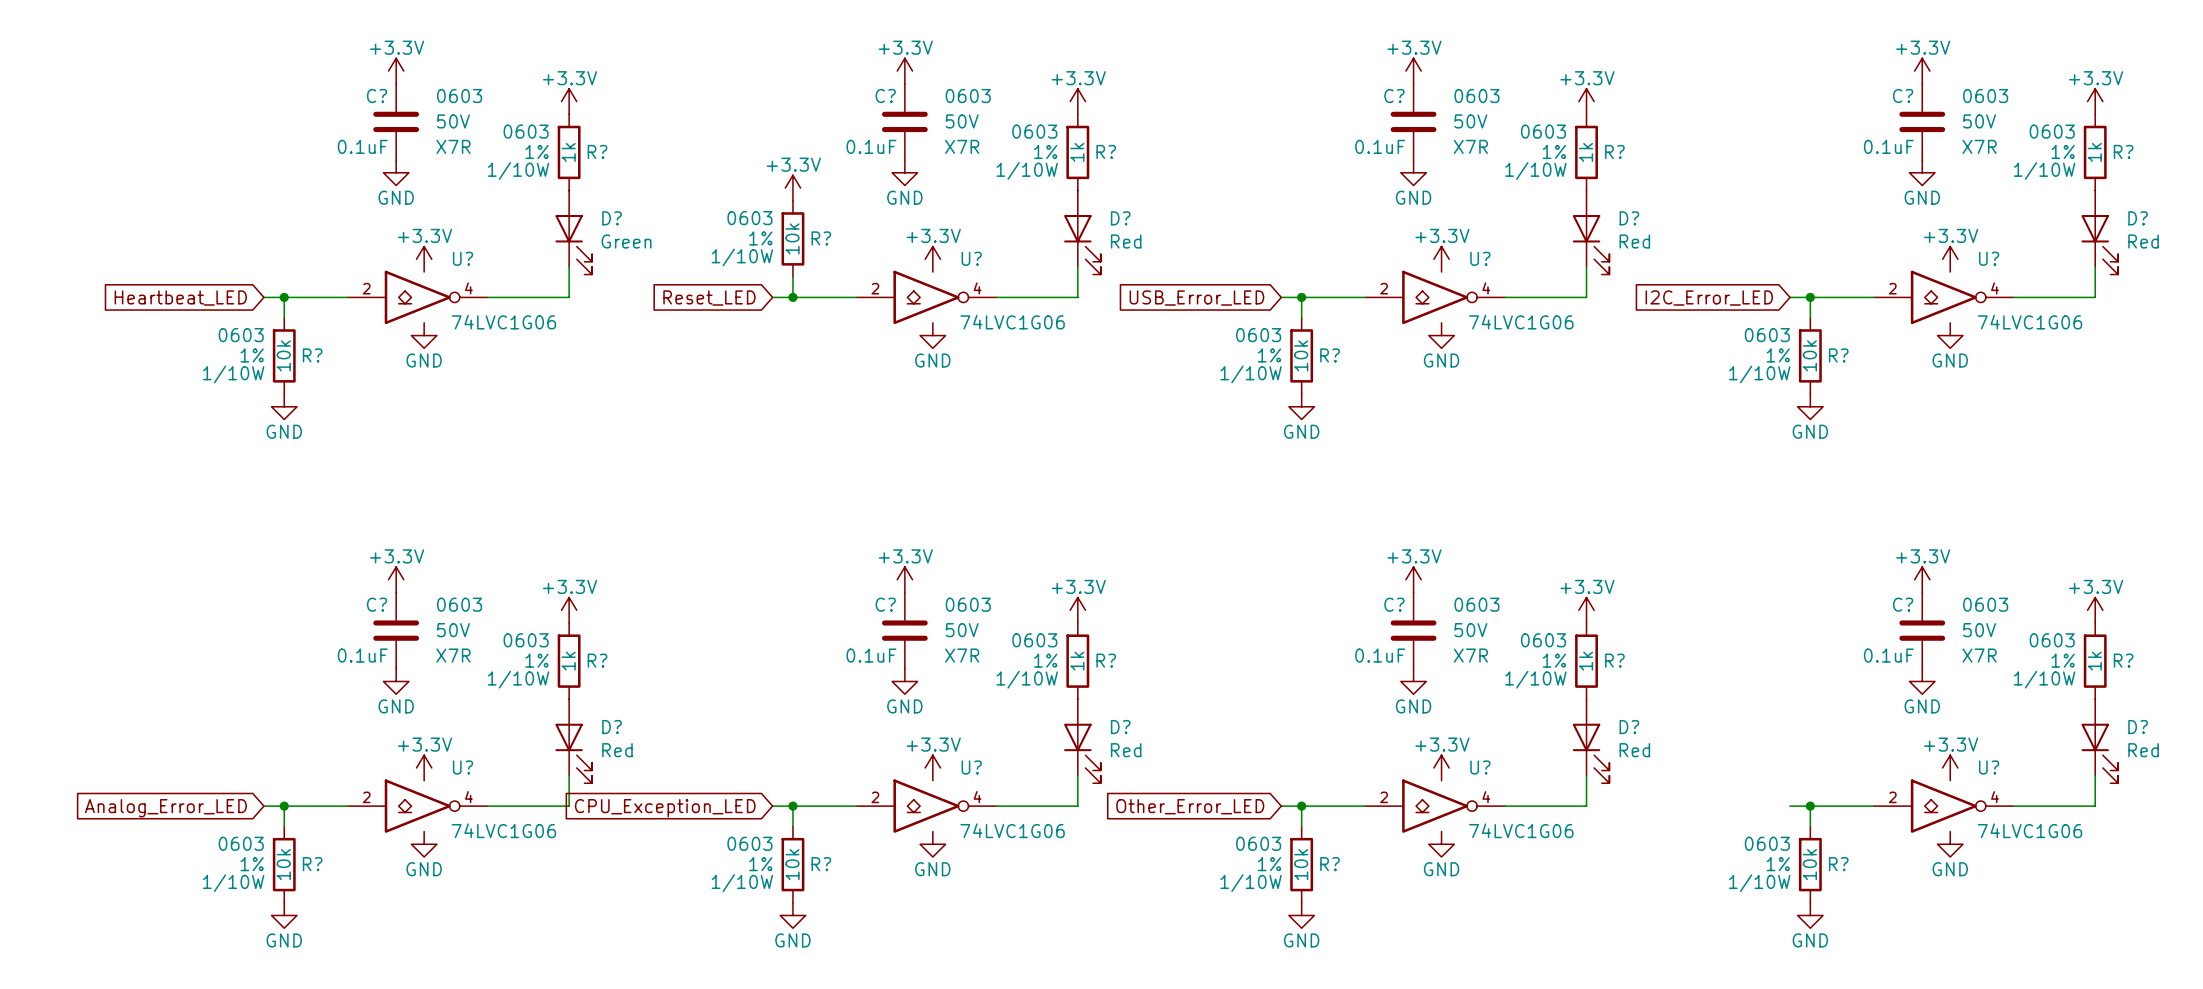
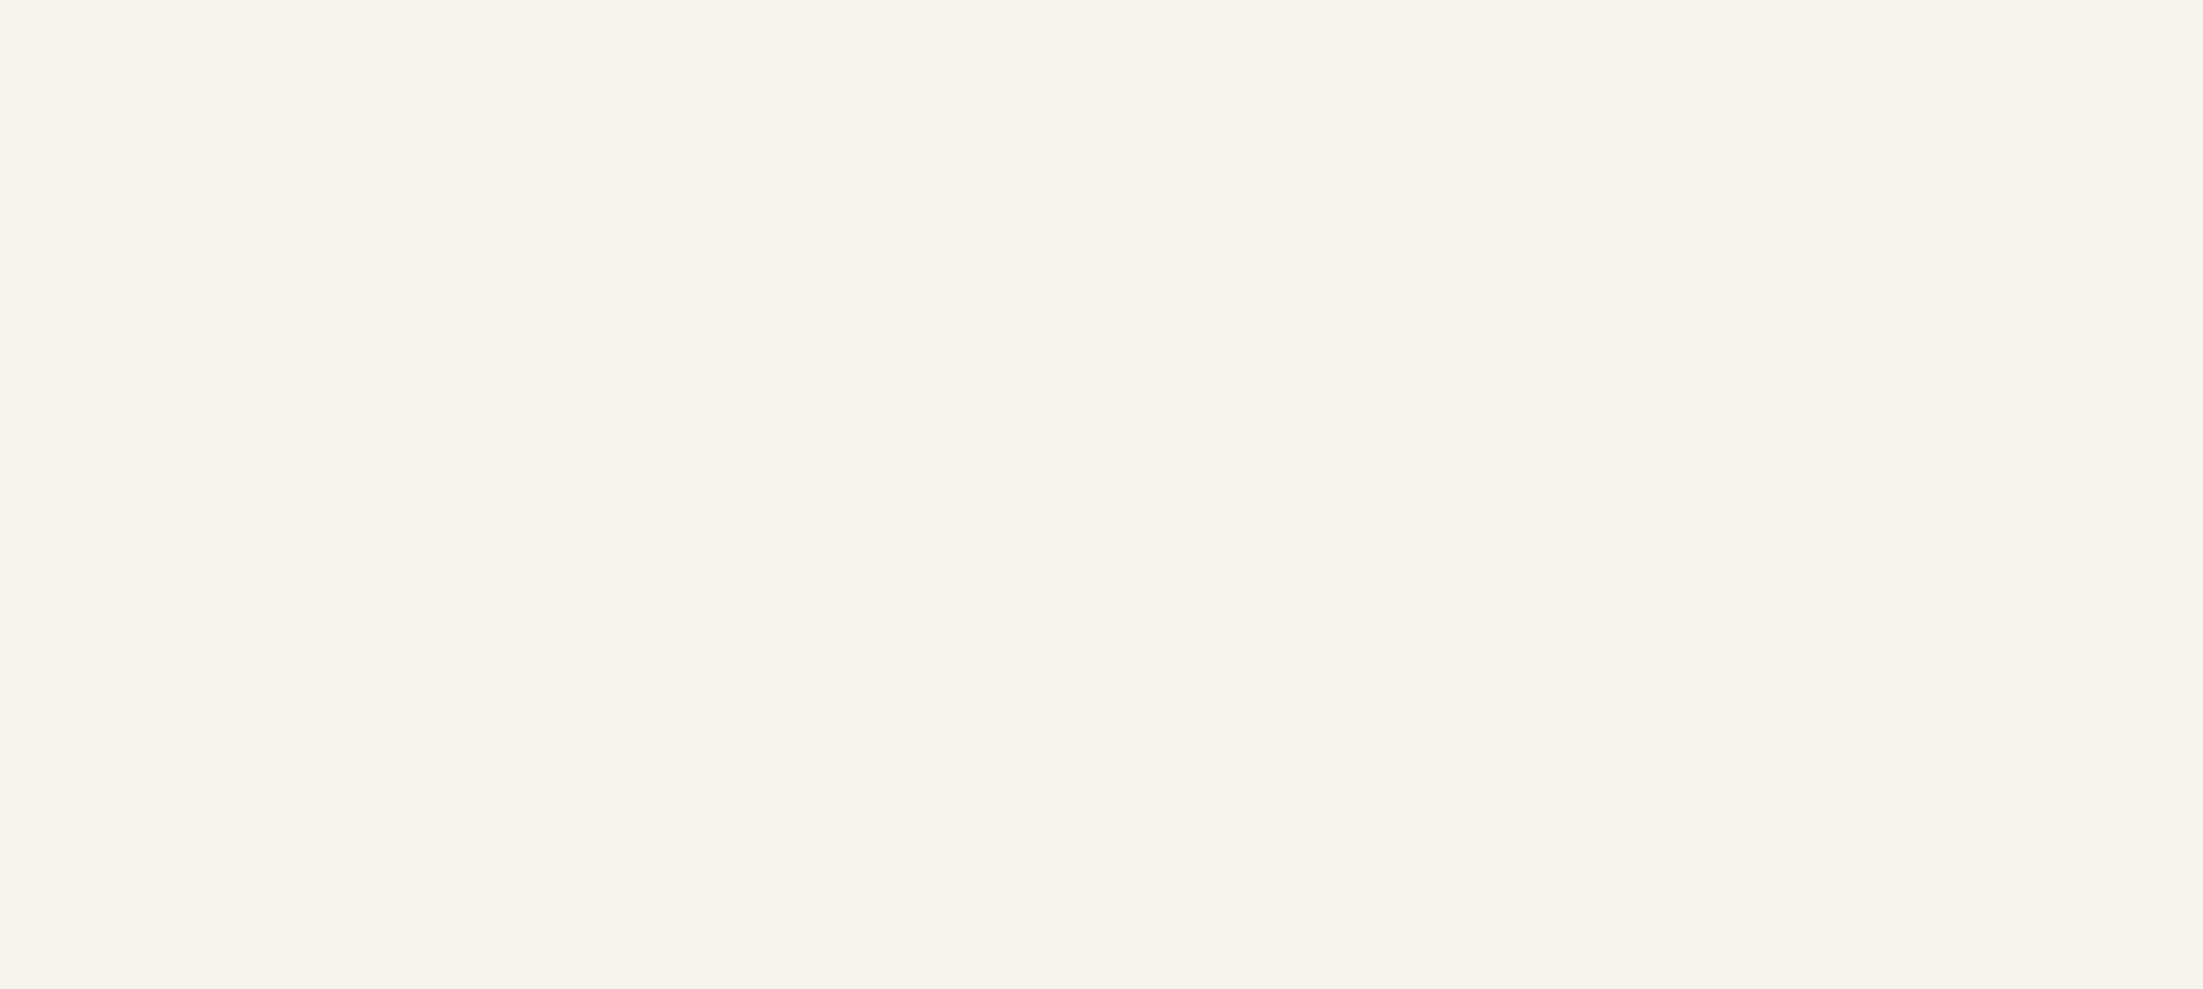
power symbol: +3.3V (396, 71) -> none
power symbol: +3.3V (904, 71) -> none
power symbol: +3.3V (1413, 71) -> none
power symbol: +3.3V (1922, 71) -> none
power symbol: +3.3V (569, 101) -> none
power symbol: +3.3V (1077, 101) -> none
power symbol: +3.3V (1586, 101) -> none
power symbol: +3.3V (2095, 101) -> none
C?: 0.1uF (396, 121) -> none
C?: 0.1uF (904, 121) -> none
C?: 0.1uF (1413, 121) -> none
C?: 0.1uF (1922, 121) -> none
R?: 1k (569, 152) -> none
R?: 1k (1077, 152) -> none
R?: 1k (1586, 152) -> none
R?: 1k (2095, 152) -> none
power symbol: GND (396, 172) -> none
power symbol: GND (904, 172) -> none
power symbol: GND (1413, 172) -> none
power symbol: GND (1922, 172) -> none
power symbol: +3.3V (792, 188) -> none
D?: Green (573, 232) -> none
D?: Red (1082, 232) -> none
D?: Red (1591, 232) -> none
D?: Red (2099, 232) -> none
R?: 10k (792, 238) -> none
power symbol: +3.3V (424, 259) -> none
power symbol: +3.3V (932, 259) -> none
power symbol: +3.3V (1441, 259) -> none
power symbol: +3.3V (1950, 259) -> none
wire: (569, 266) (569, 297) (487, 297) -> none
wire: (1077, 266) (1077, 297) (996, 297) -> none
wire: (1586, 266) (1586, 297) (1505, 297) -> none
wire: (2095, 266) (2095, 297) (2013, 297) -> none
wire: (792, 277) (792, 297) -> none
wire: (263, 297) (347, 297) -> none
wire: (284, 297) (284, 317) -> none
junction: (284, 297) -> none
U?: 74LVC1G06 (417, 297) -> none
wire: (772, 297) (856, 297) -> none
junction: (792, 297) -> none
U?: 74LVC1G06 (926, 297) -> none
wire: (1281, 297) (1365, 297) -> none
wire: (1301, 297) (1301, 317) -> none
junction: (1301, 297) -> none
U?: 74LVC1G06 (1435, 297) -> none
wire: (1790, 297) (1873, 297) -> none
wire: (1810, 297) (1810, 317) -> none
junction: (1810, 297) -> none
U?: 74LVC1G06 (1943, 297) -> none
global label: Heartbeat_LED (180, 298) -> none
global label: Reset_LED (709, 298) -> none
global label: USB_Error_LED (1196, 298) -> none
global label: I2C_Error_LED (1709, 298) -> none
power symbol: GND (424, 335) -> none
power symbol: GND (932, 335) -> none
power symbol: GND (1441, 335) -> none
power symbol: GND (1950, 335) -> none
R?: 10k (284, 355) -> none
R?: 10k (1301, 355) -> none
R?: 10k (1810, 355) -> none
power symbol: GND (284, 406) -> none
power symbol: GND (1301, 406) -> none
power symbol: GND (1810, 406) -> none
power symbol: +3.3V (396, 579) -> none
power symbol: +3.3V (904, 579) -> none
power symbol: +3.3V (1413, 579) -> none
power symbol: +3.3V (1922, 579) -> none
power symbol: +3.3V (569, 610) -> none
power symbol: +3.3V (1077, 610) -> none
power symbol: +3.3V (1586, 610) -> none
power symbol: +3.3V (2095, 610) -> none
C?: 0.1uF (396, 630) -> none
C?: 0.1uF (904, 630) -> none
C?: 0.1uF (1413, 630) -> none
C?: 0.1uF (1922, 630) -> none
R?: 1k (569, 661) -> none
R?: 1k (1077, 661) -> none
R?: 1k (1586, 661) -> none
R?: 1k (2095, 661) -> none
power symbol: GND (396, 681) -> none
power symbol: GND (904, 681) -> none
power symbol: GND (1413, 681) -> none
power symbol: GND (1922, 681) -> none
D?: Red (573, 741) -> none
D?: Red (1082, 741) -> none
D?: Red (1591, 741) -> none
D?: Red (2099, 741) -> none
power symbol: +3.3V (424, 767) -> none
power symbol: +3.3V (932, 767) -> none
power symbol: +3.3V (1441, 767) -> none
power symbol: +3.3V (1950, 767) -> none
wire: (569, 775) (569, 806) (487, 806) -> none
wire: (1077, 775) (1077, 806) (996, 806) -> none
wire: (1586, 775) (1586, 806) (1505, 806) -> none
wire: (2095, 775) (2095, 806) (2013, 806) -> none
wire: (263, 806) (347, 806) -> none
wire: (284, 806) (284, 826) -> none
junction: (284, 806) -> none
U?: 74LVC1G06 (417, 806) -> none
wire: (772, 806) (856, 806) -> none
wire: (792, 806) (792, 826) -> none
junction: (792, 806) -> none
U?: 74LVC1G06 (926, 806) -> none
global label: Other_Error_LED (1190, 806) -> none
wire: (1281, 806) (1365, 806) -> none
wire: (1301, 806) (1301, 826) -> none
junction: (1301, 806) -> none
U?: 74LVC1G06 (1435, 806) -> none
wire: (1790, 806) (1873, 806) -> none
wire: (1810, 806) (1810, 826) -> none
junction: (1810, 806) -> none
U?: 74LVC1G06 (1943, 806) -> none
global label: Analog_Error_LED (165, 808) -> none
global label: CPU_Exception_LED (665, 808) -> none
power symbol: GND (424, 844) -> none
power symbol: GND (932, 844) -> none
power symbol: GND (1441, 844) -> none
power symbol: GND (1950, 844) -> none
R?: 10k (284, 864) -> none
R?: 10k (792, 864) -> none
R?: 10k (1301, 864) -> none
R?: 10k (1810, 864) -> none
power symbol: GND (284, 915) -> none
power symbol: GND (792, 915) -> none
power symbol: GND (1301, 915) -> none
power symbol: GND (1810, 915) -> none

